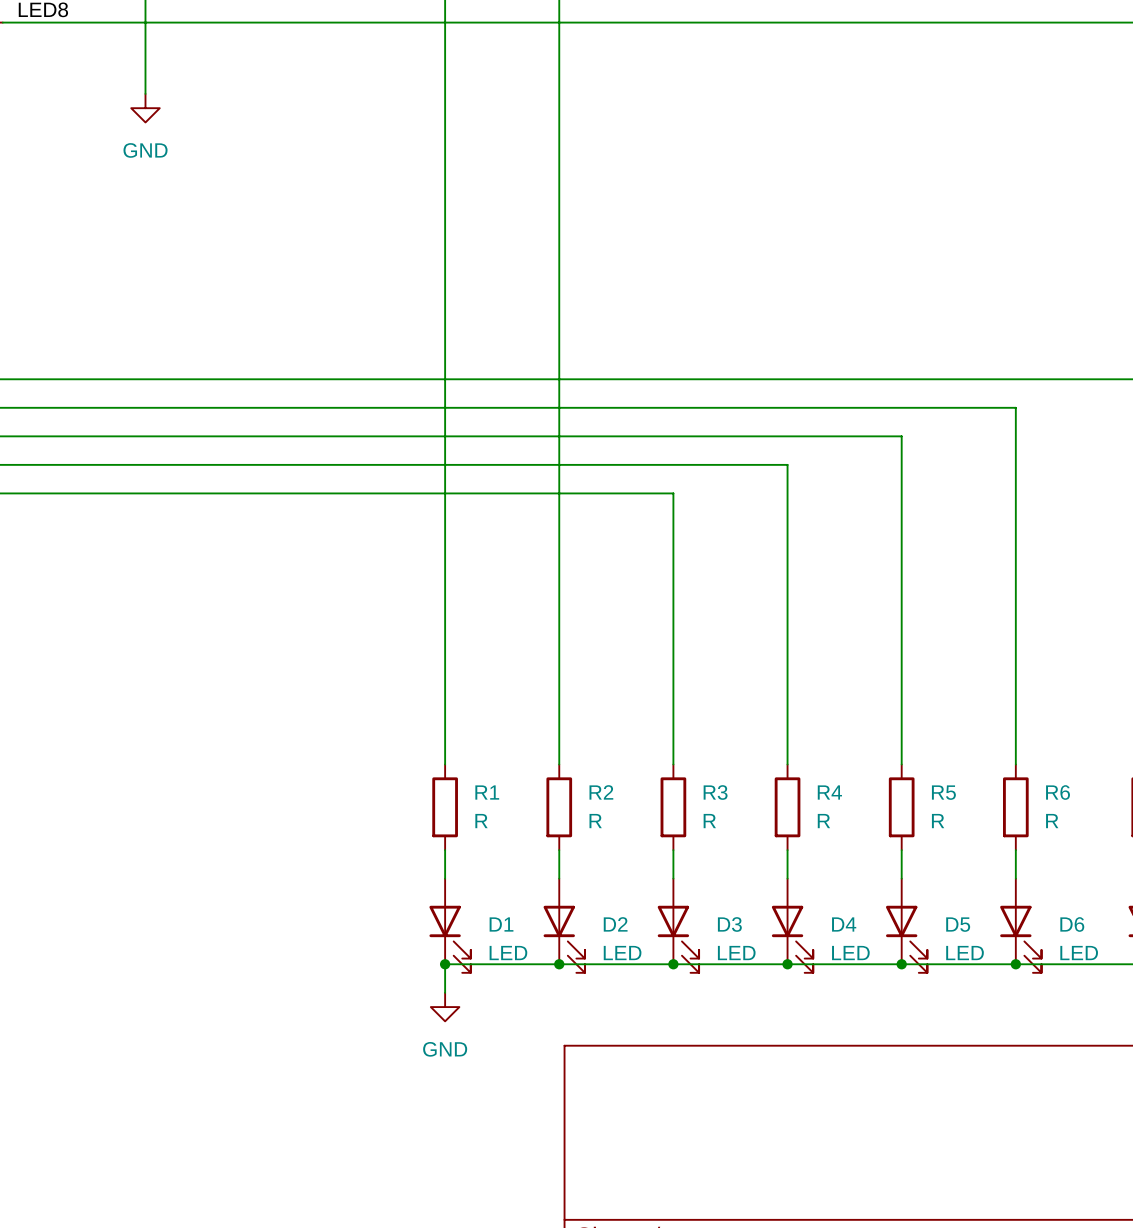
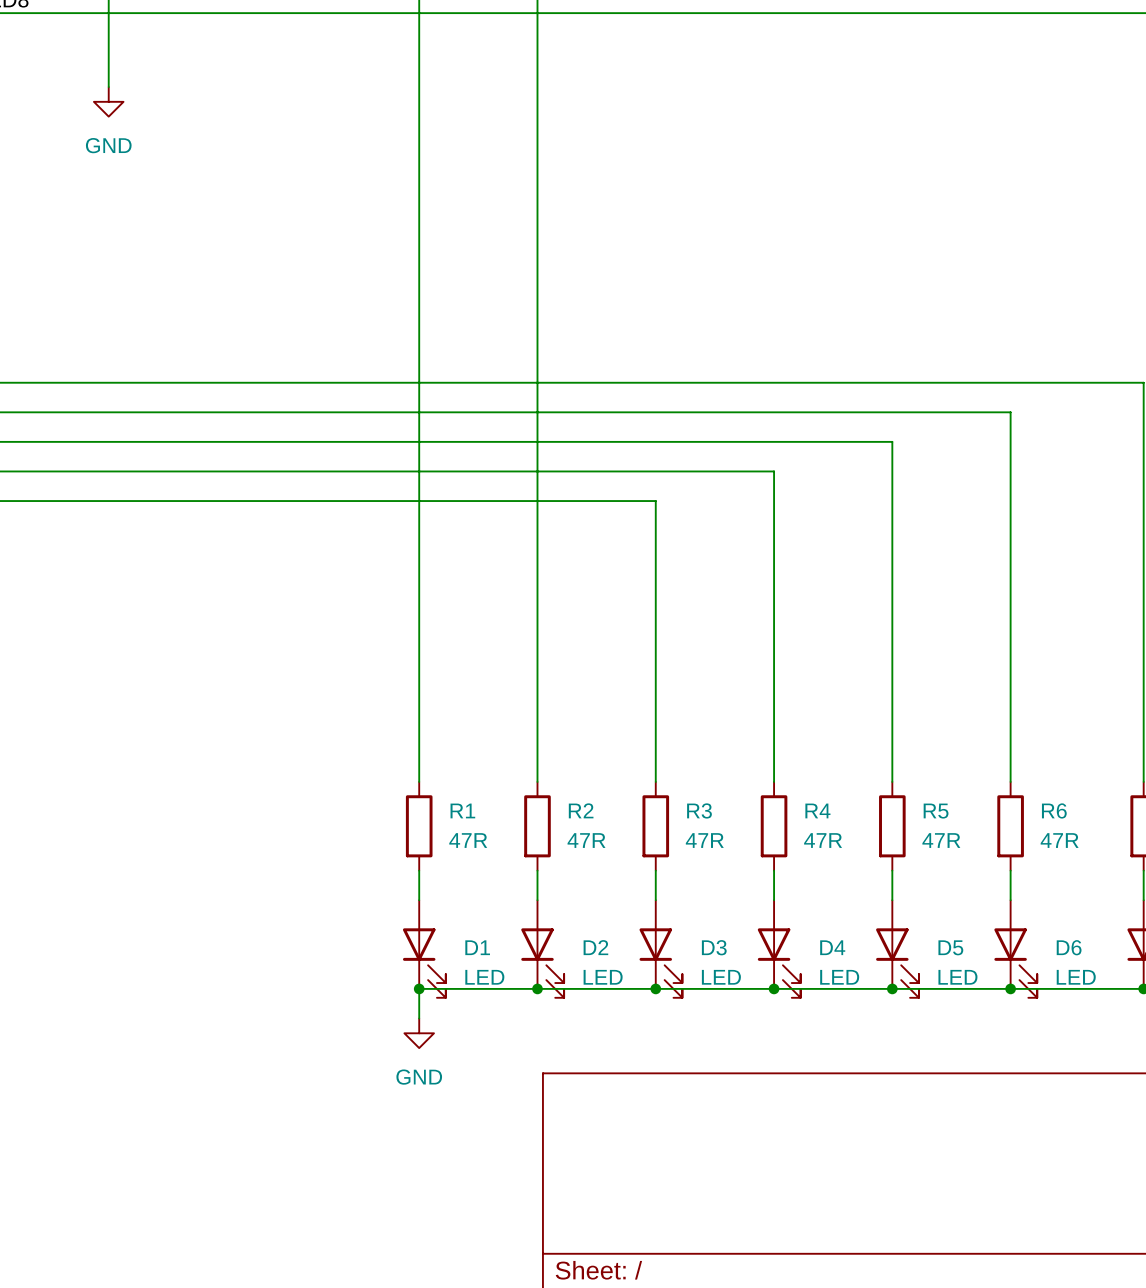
R1 value: R (481, 821) -> 47R (468, 840)
R2 value: R (595, 821) -> 47R (586, 840)
R3 value: R (709, 821) -> 47R (704, 840)
R4 value: R (823, 821) -> 47R (823, 840)
R5 value: R (938, 821) -> 47R (941, 840)
R6 value: R (1052, 821) -> 47R (1059, 840)

